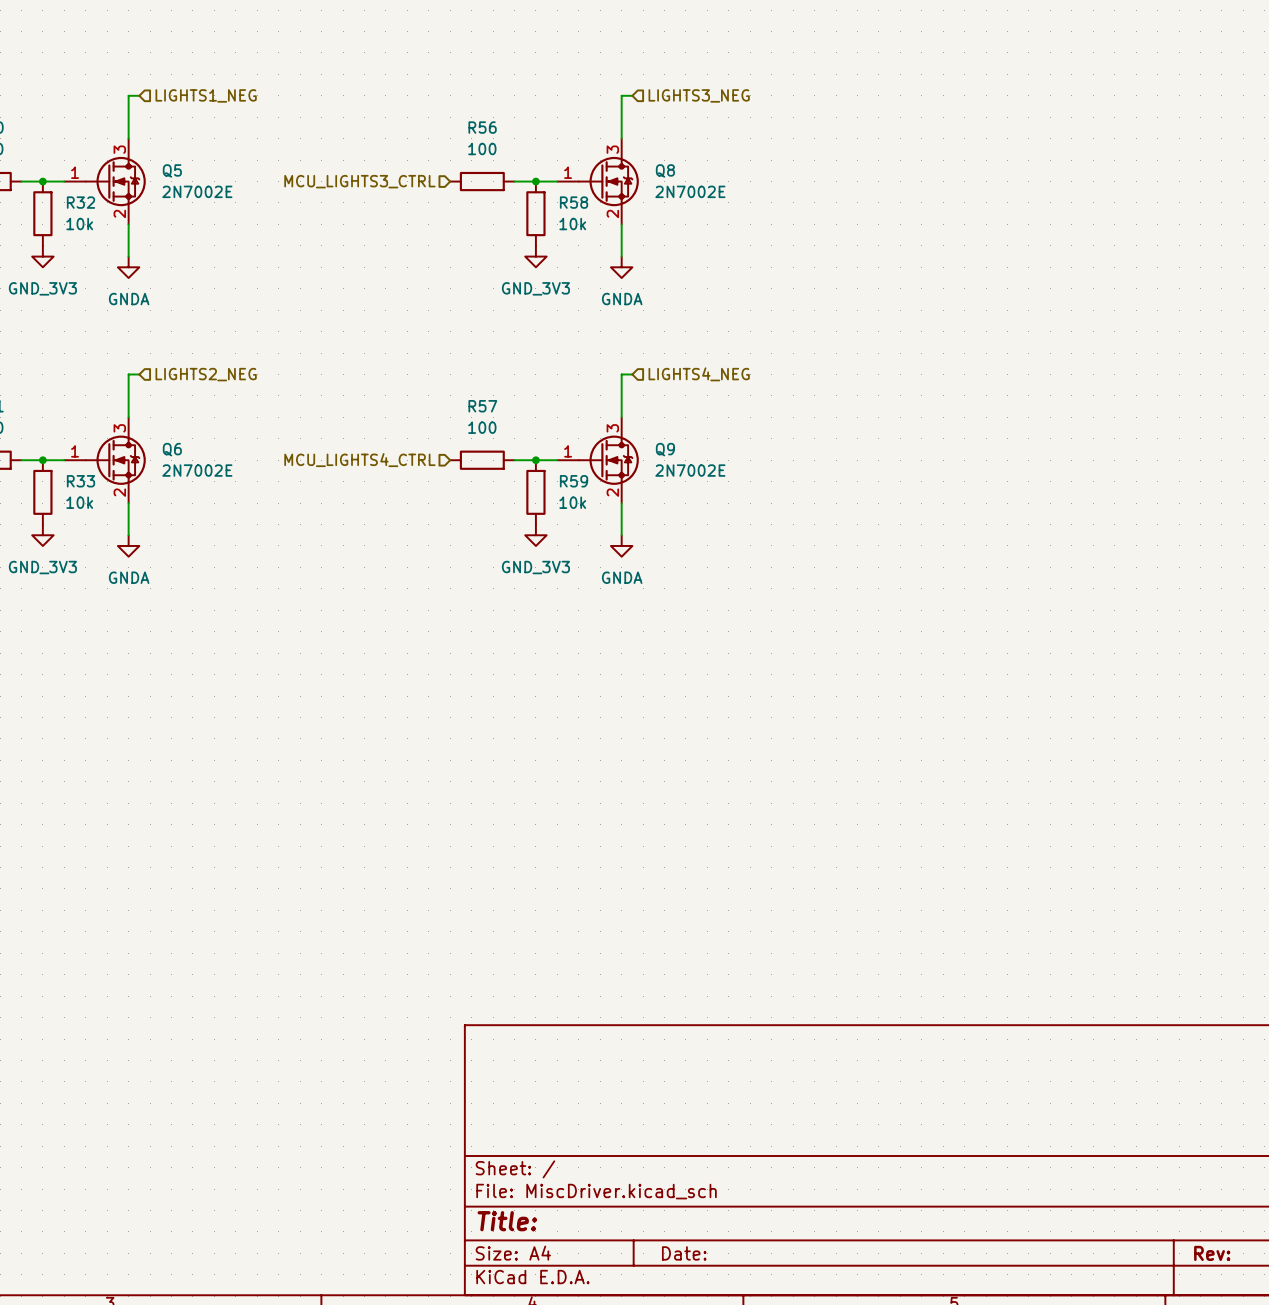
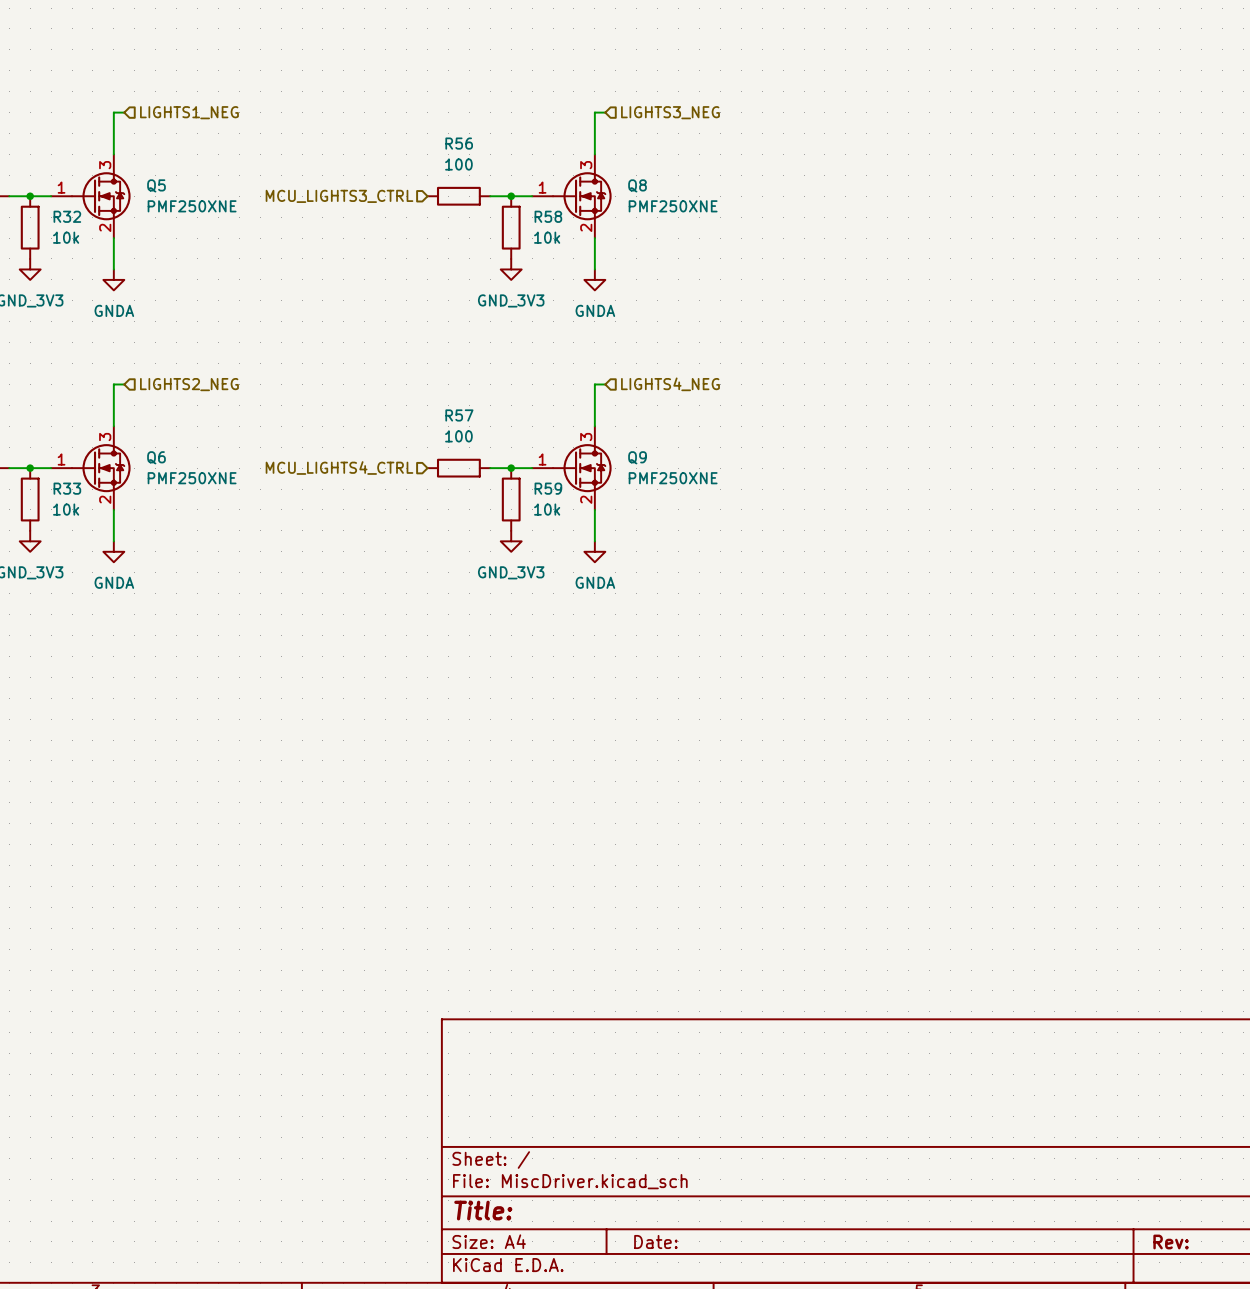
Q5 value: 2N7002E (197, 191) -> PMF250XNE (192, 206)
Q8 value: 2N7002E (690, 191) -> PMF250XNE (673, 206)
Q6 value: 2N7002E (197, 470) -> PMF250XNE (192, 478)
Q9 value: 2N7002E (690, 470) -> PMF250XNE (673, 478)

